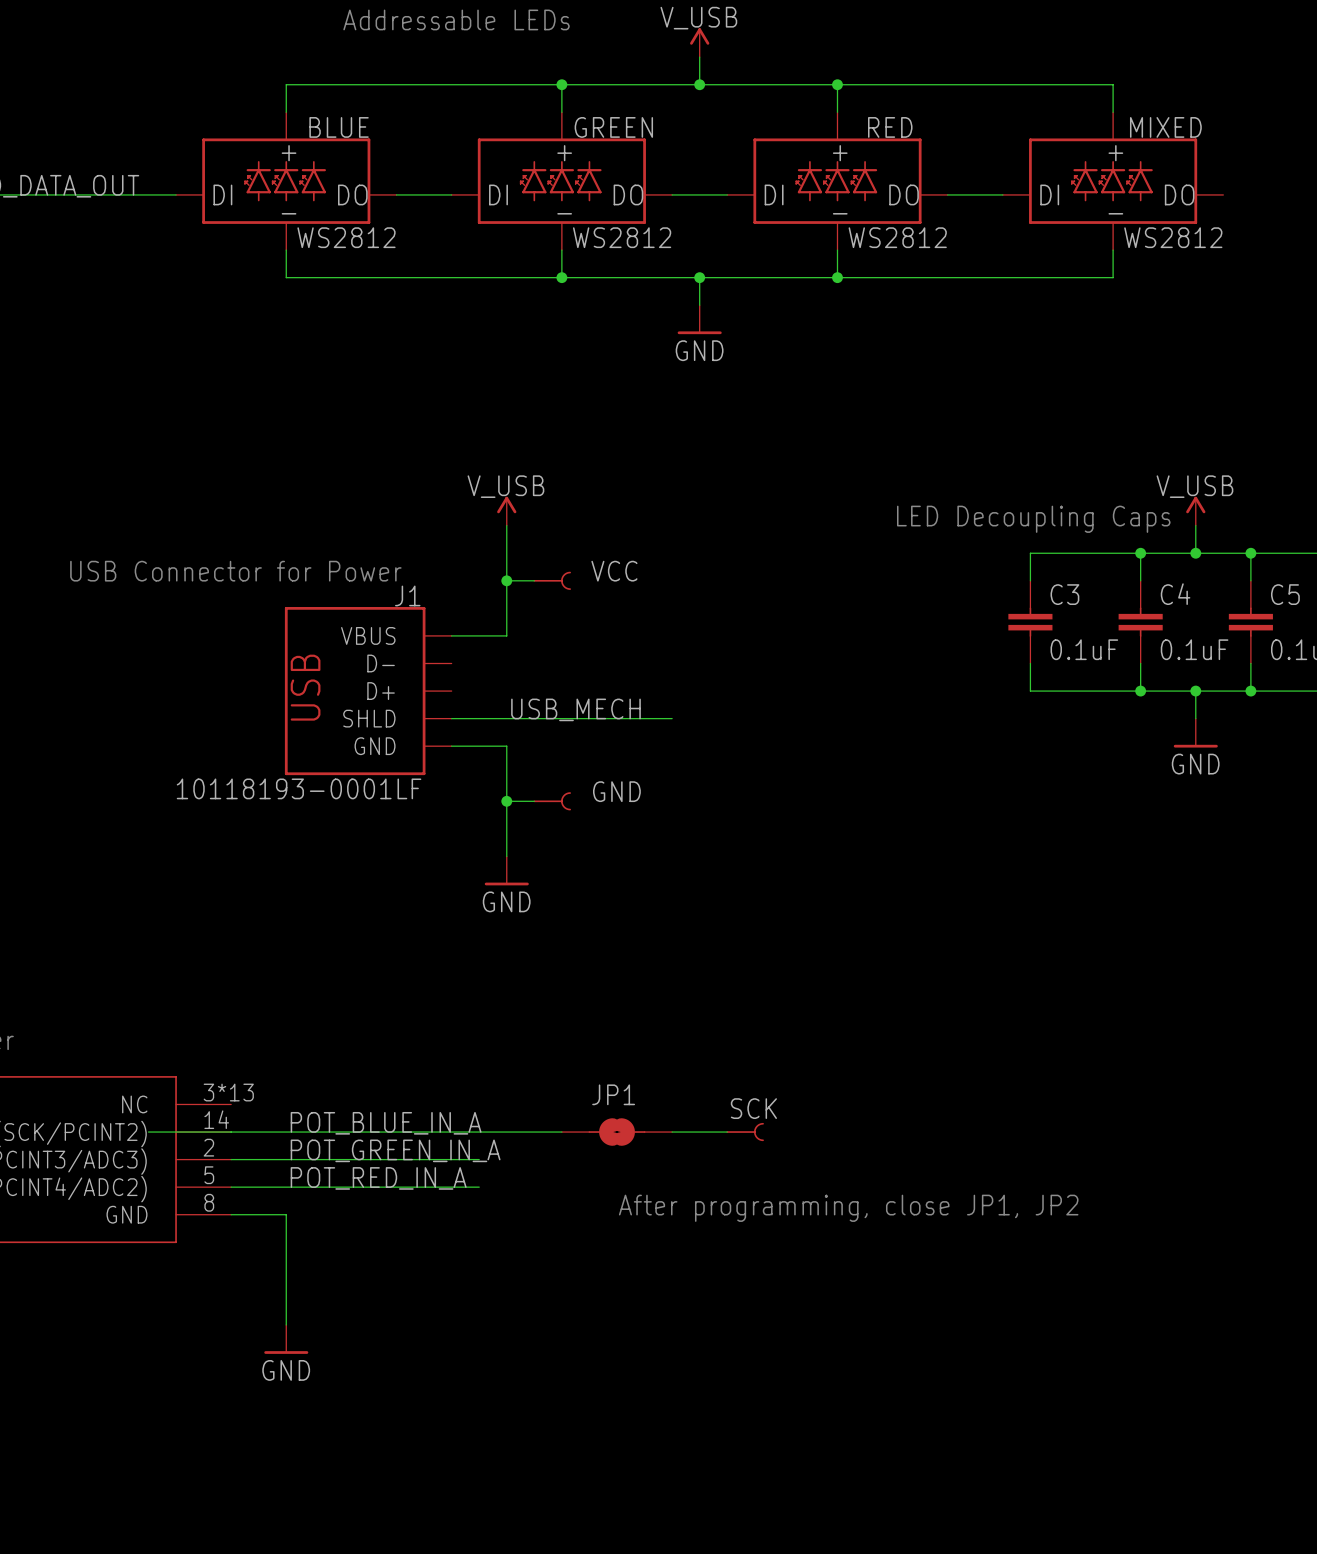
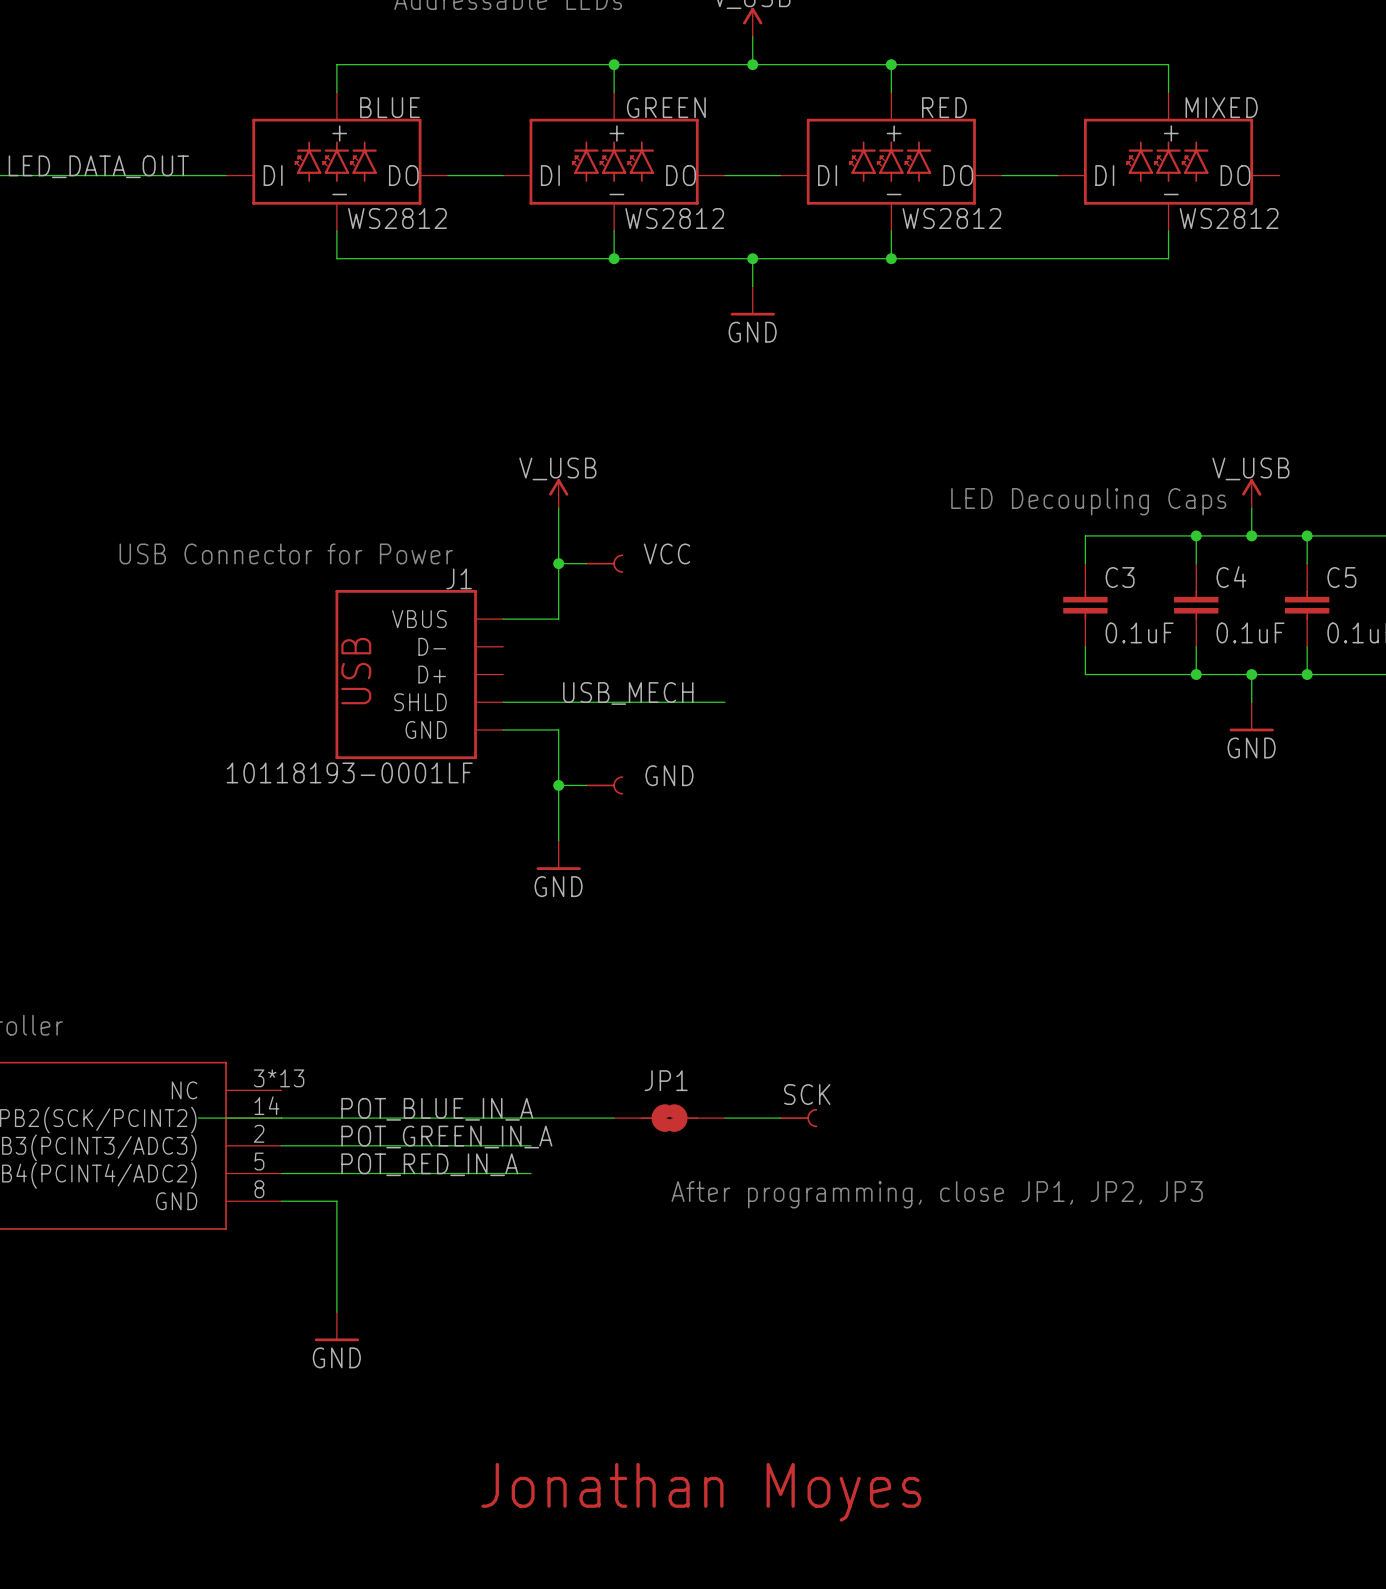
text: After programming, close JP1, JP2 (848, 1208) -> After programming, close JP1, JP2, JP3 (937, 1194)
text: none -> Jonathan Moyes (701, 1492)

